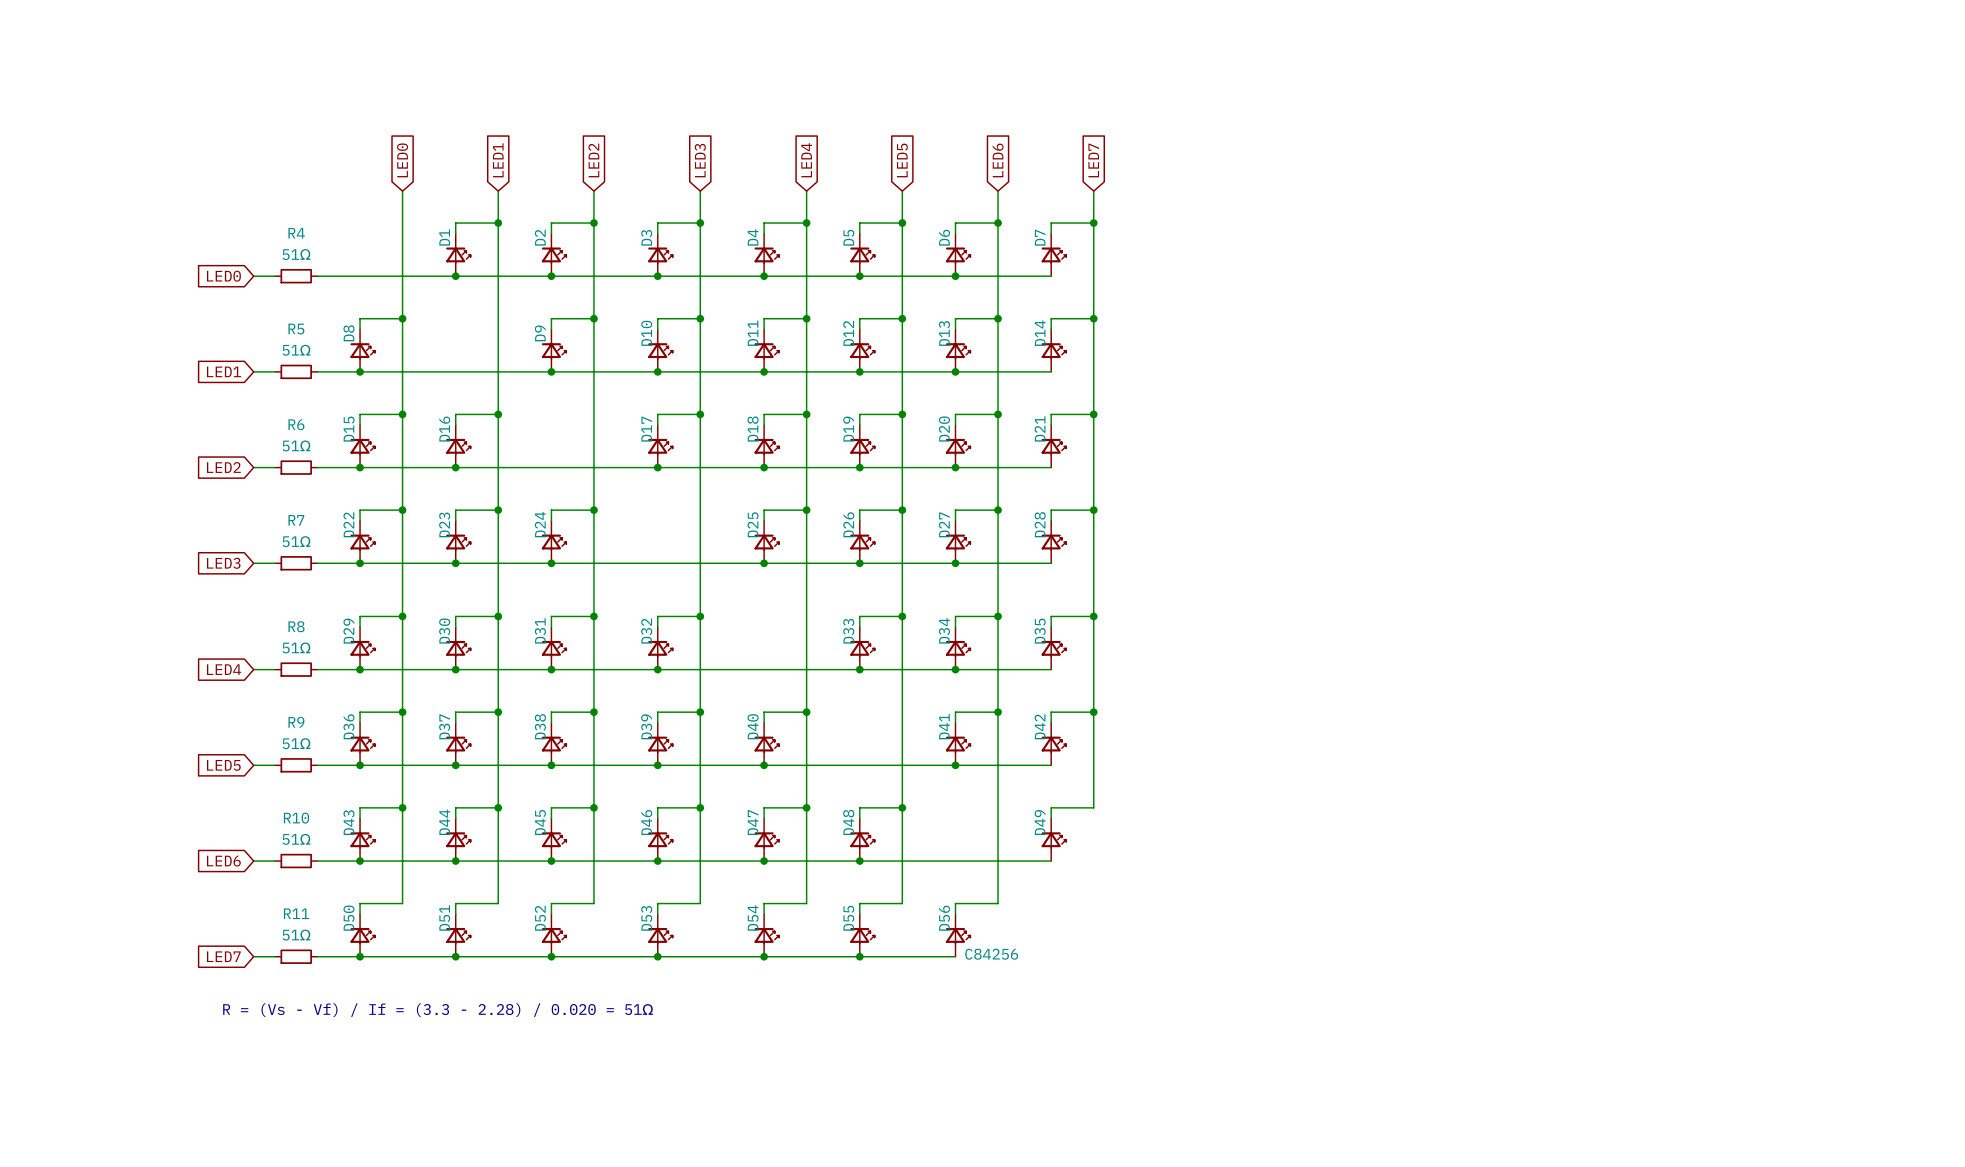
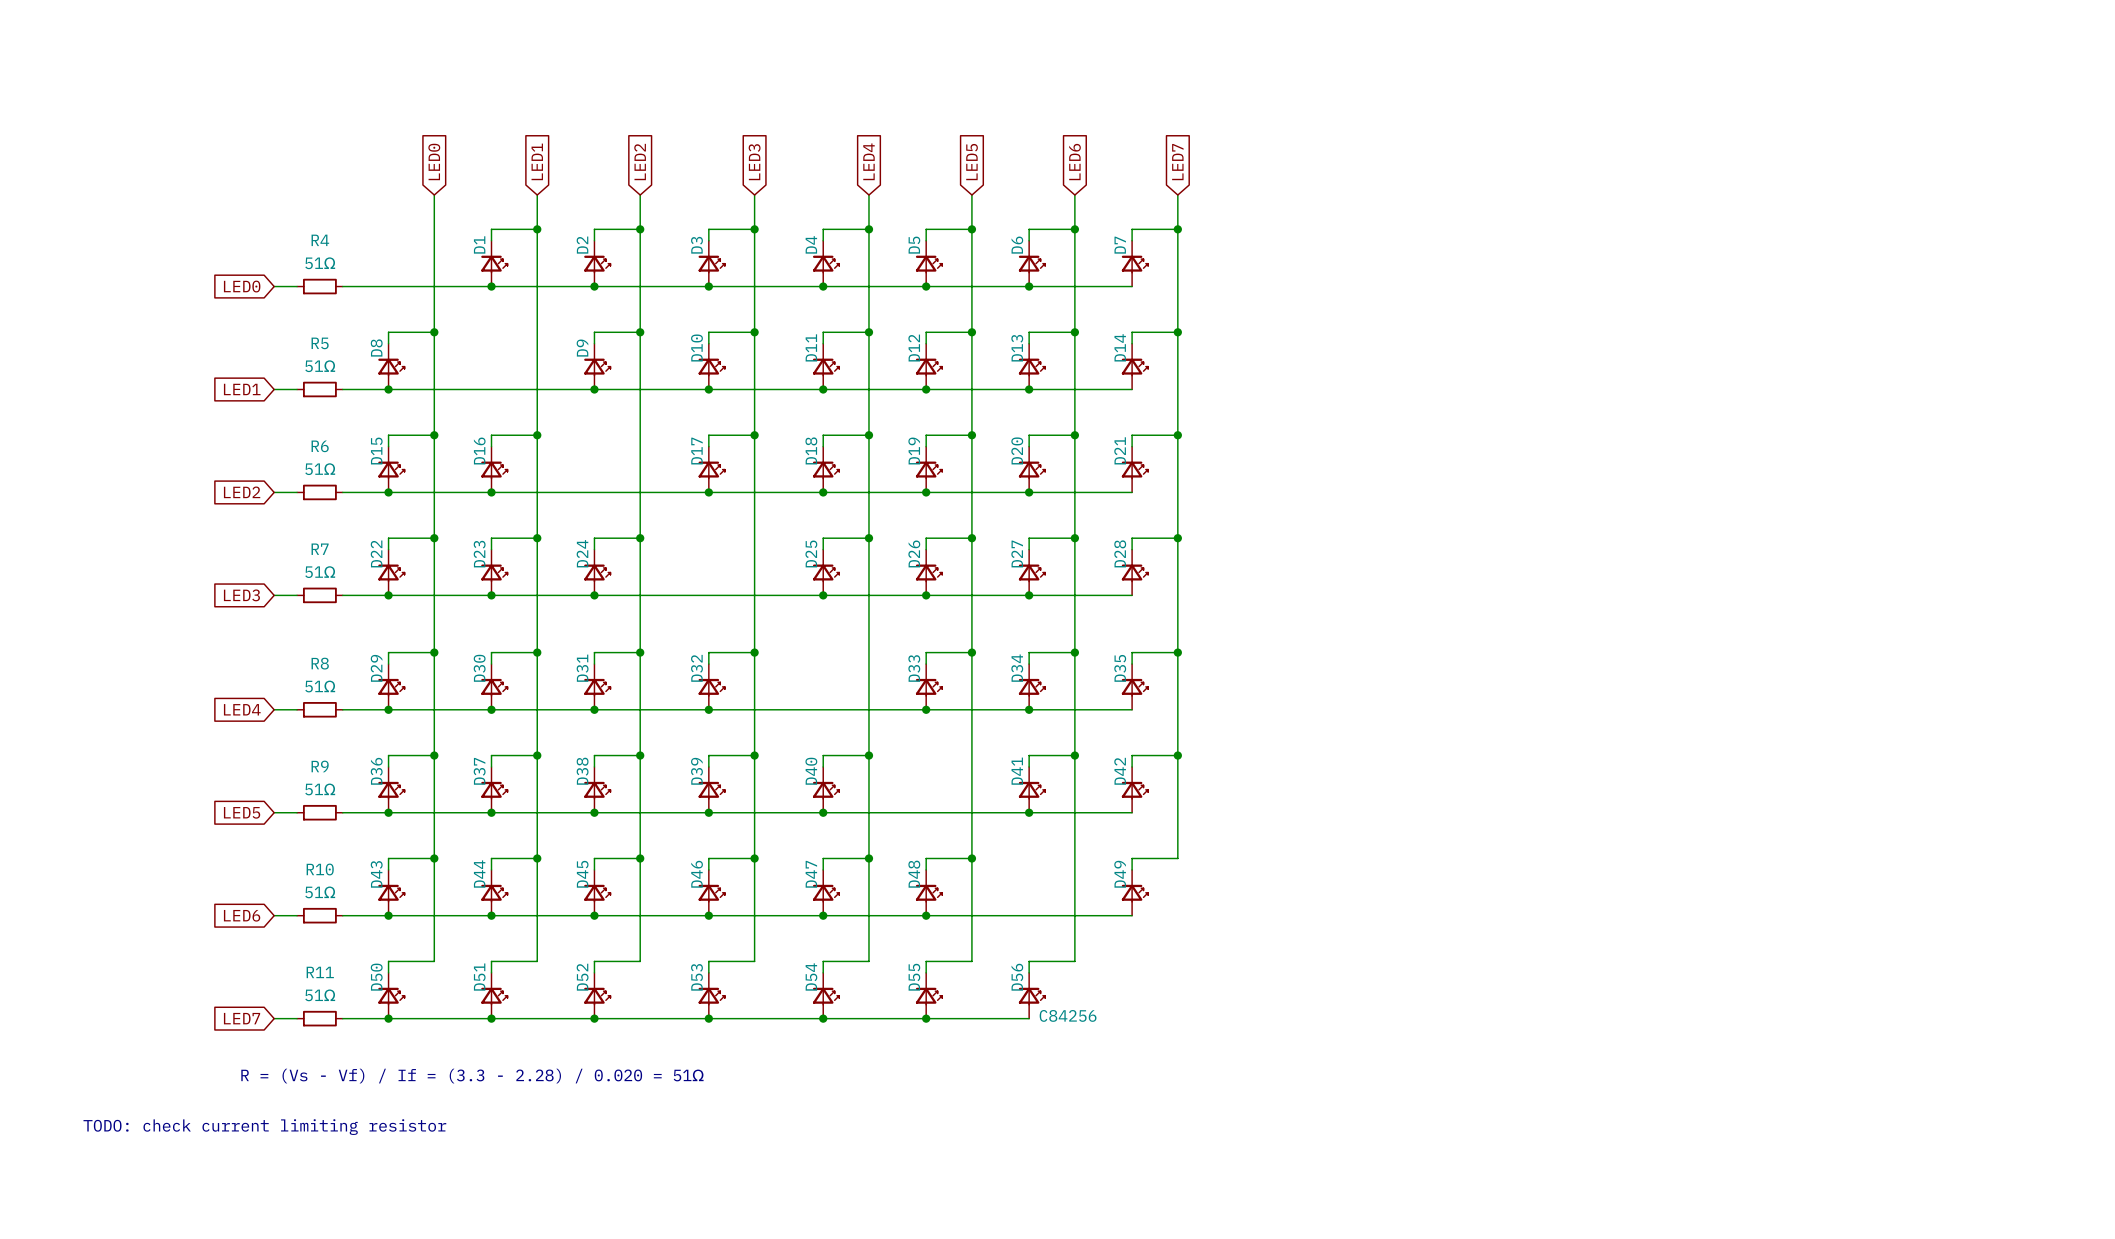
text: none -> TODO: check current limiting resistor (264, 1127)

